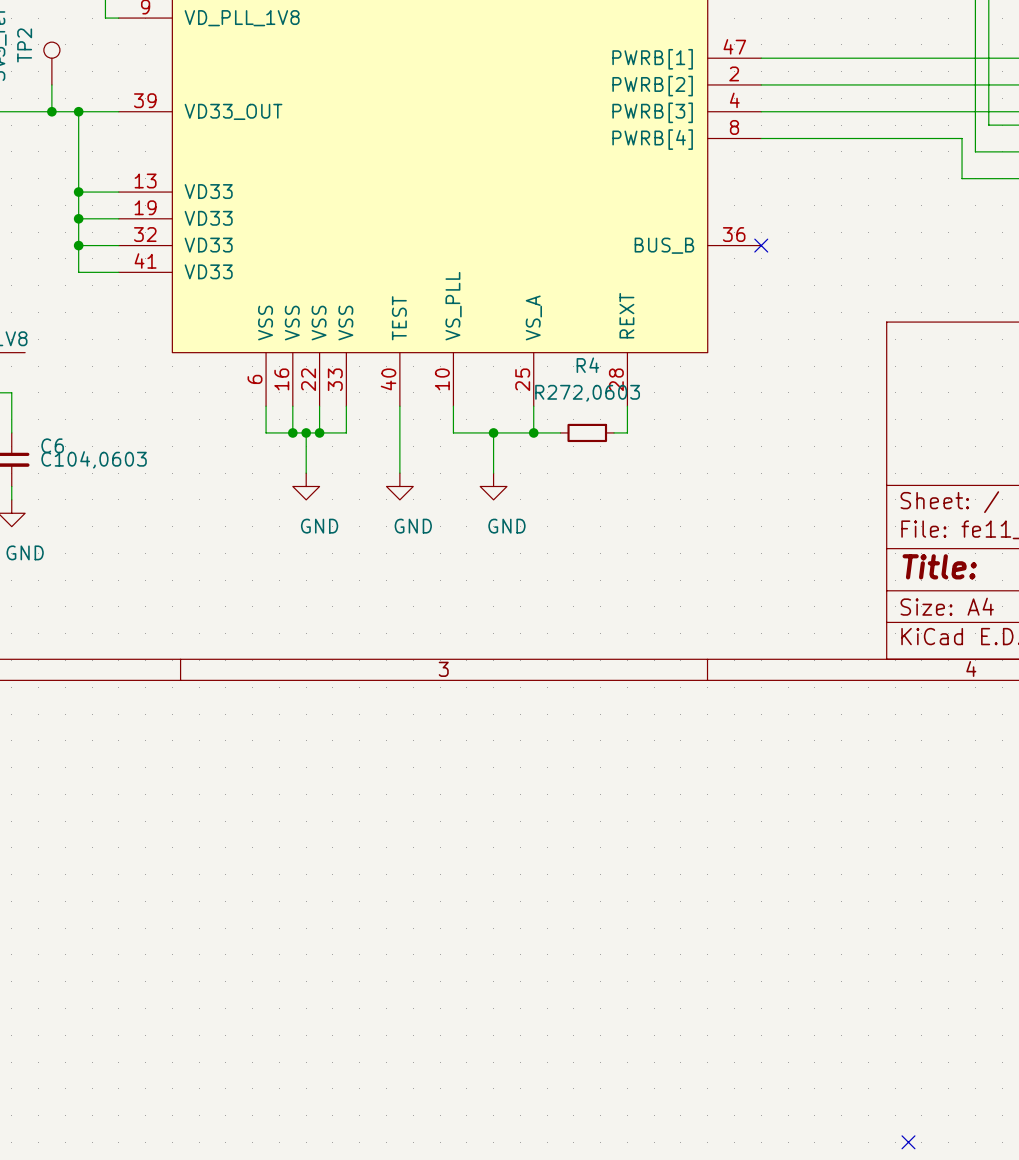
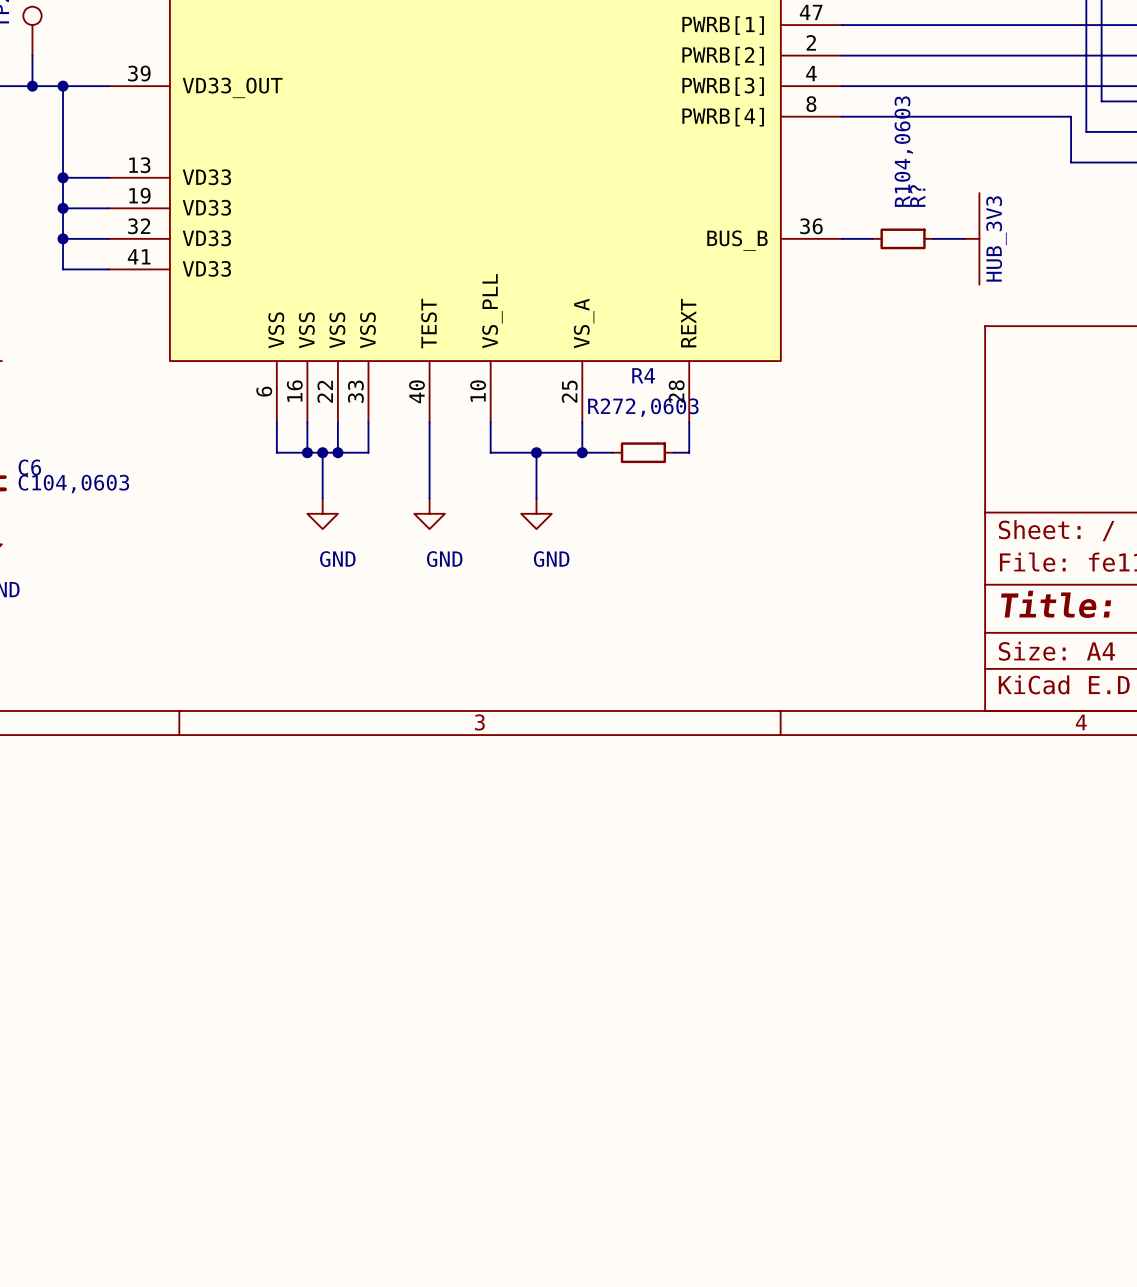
wire: none -> (841, 238) (872, 238)
no-connect mark: (761, 245) -> none
R?: none -> R104,0603 (903, 238)
wire: none -> (933, 238) (964, 238)
power symbol: none -> HUB_3V3 (971, 238)
no-connect mark: (908, 1142) -> none

